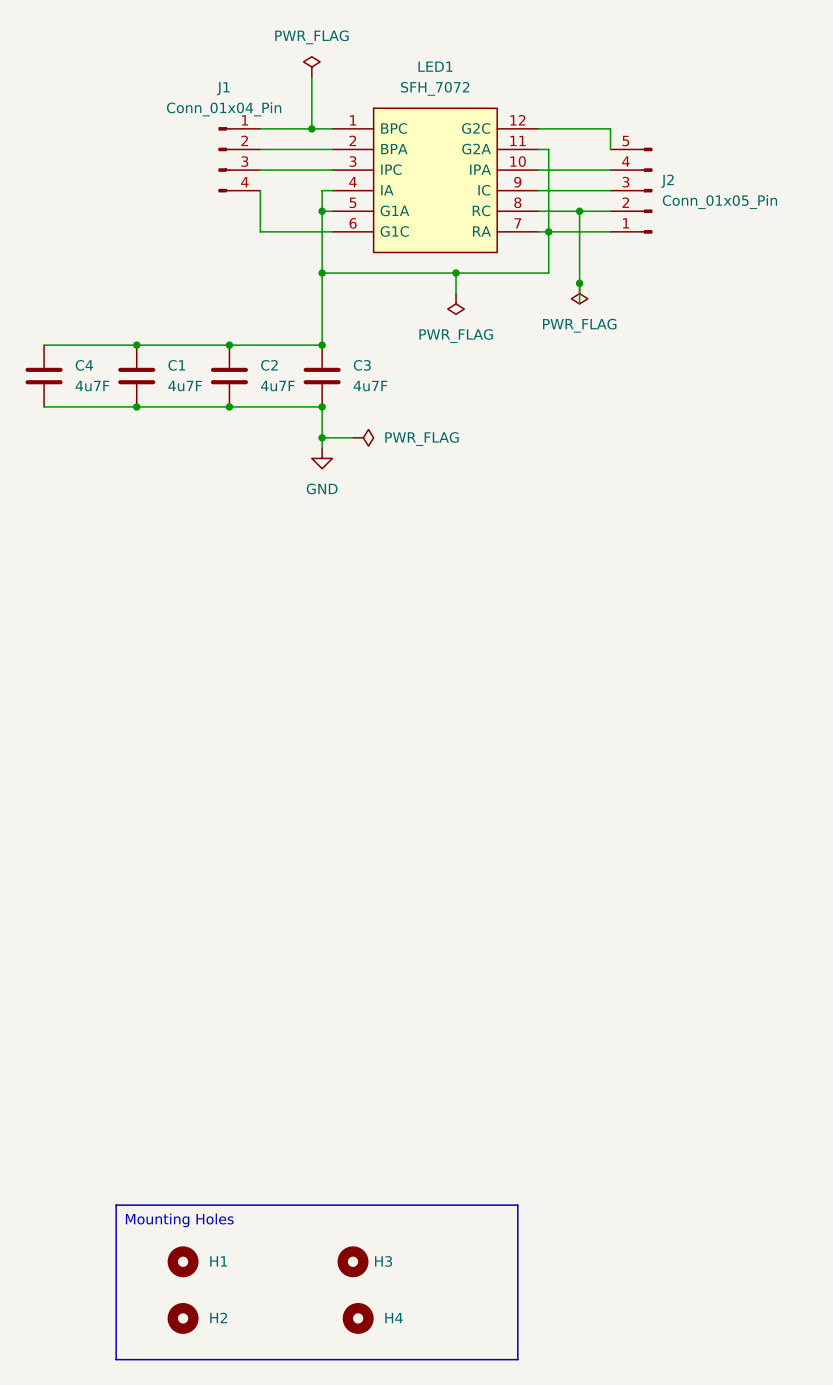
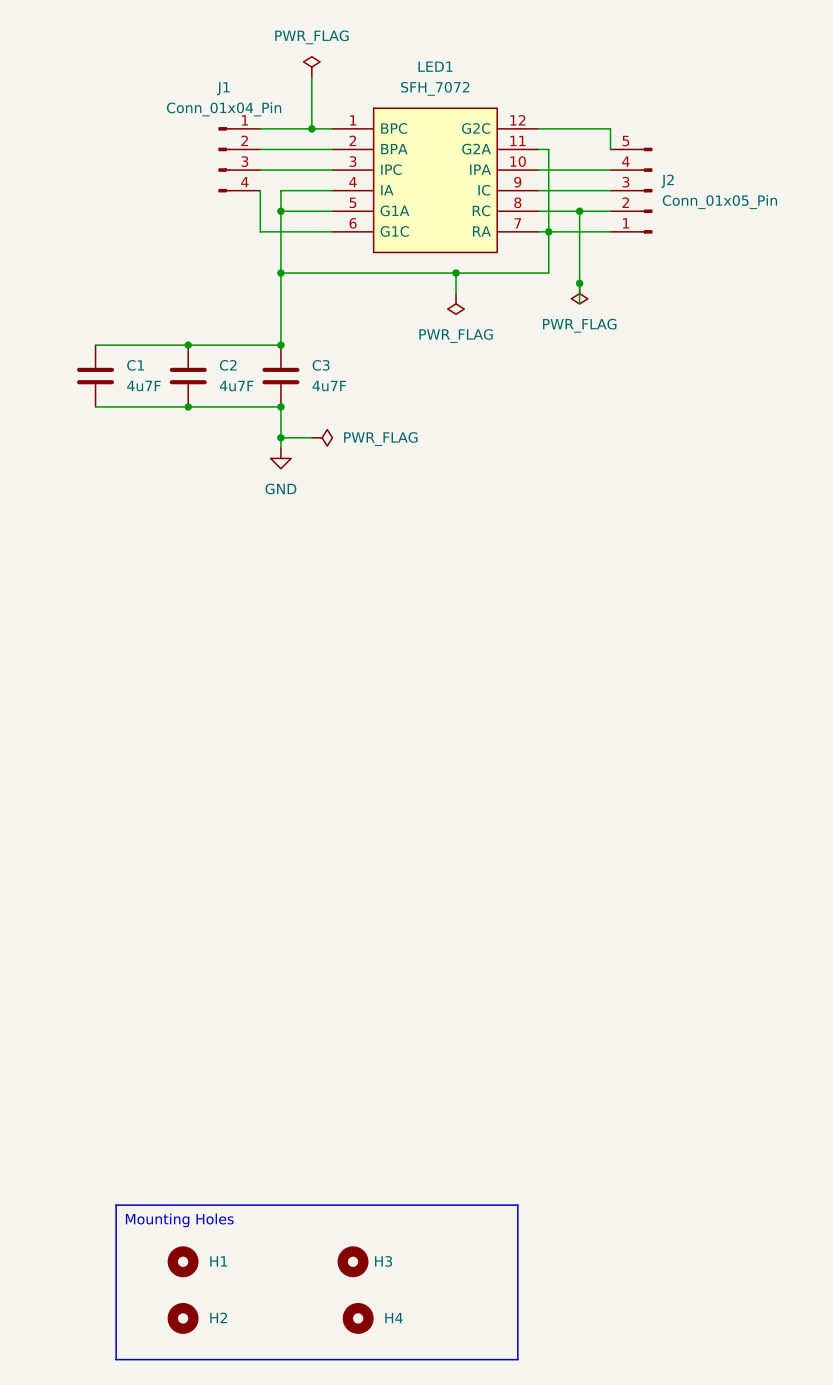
wire: (322, 190) (322, 345) (280, 345) -> (322, 190) (280, 190) (280, 345)
wire: none -> (280, 211) (322, 211)
junction: none -> (280, 211)
junction: (322, 211) -> none
wire: none -> (280, 273) (322, 273)
junction: none -> (280, 273)
junction: (322, 273) -> none
wire: (44, 345) (95, 345) -> none
junction: (136, 345) -> none
junction: none -> (188, 345)
junction: (229, 345) -> none
junction: none -> (280, 345)
junction: (322, 345) -> none
C4: 4u7F (44, 376) -> none
C1 position: (136, 376) -> (95, 376)
C2 position: (229, 376) -> (188, 376)
C3 position: (322, 376) -> (280, 376)
wire: (44, 406) (95, 406) -> none
junction: (136, 406) -> none
junction: none -> (188, 406)
junction: (229, 406) -> none
wire: (280, 406) (322, 406) (322, 448) -> (280, 406) (280, 448)
junction: none -> (280, 406)
junction: (322, 406) -> none
junction: none -> (280, 437)
wire: (322, 437) (353, 437) -> (280, 437) (311, 437)
junction: (322, 437) -> none
power symbol position: PWR_FLAG (363, 437) -> PWR_FLAG (322, 437)
power symbol position: GND (322, 458) -> GND (280, 458)

